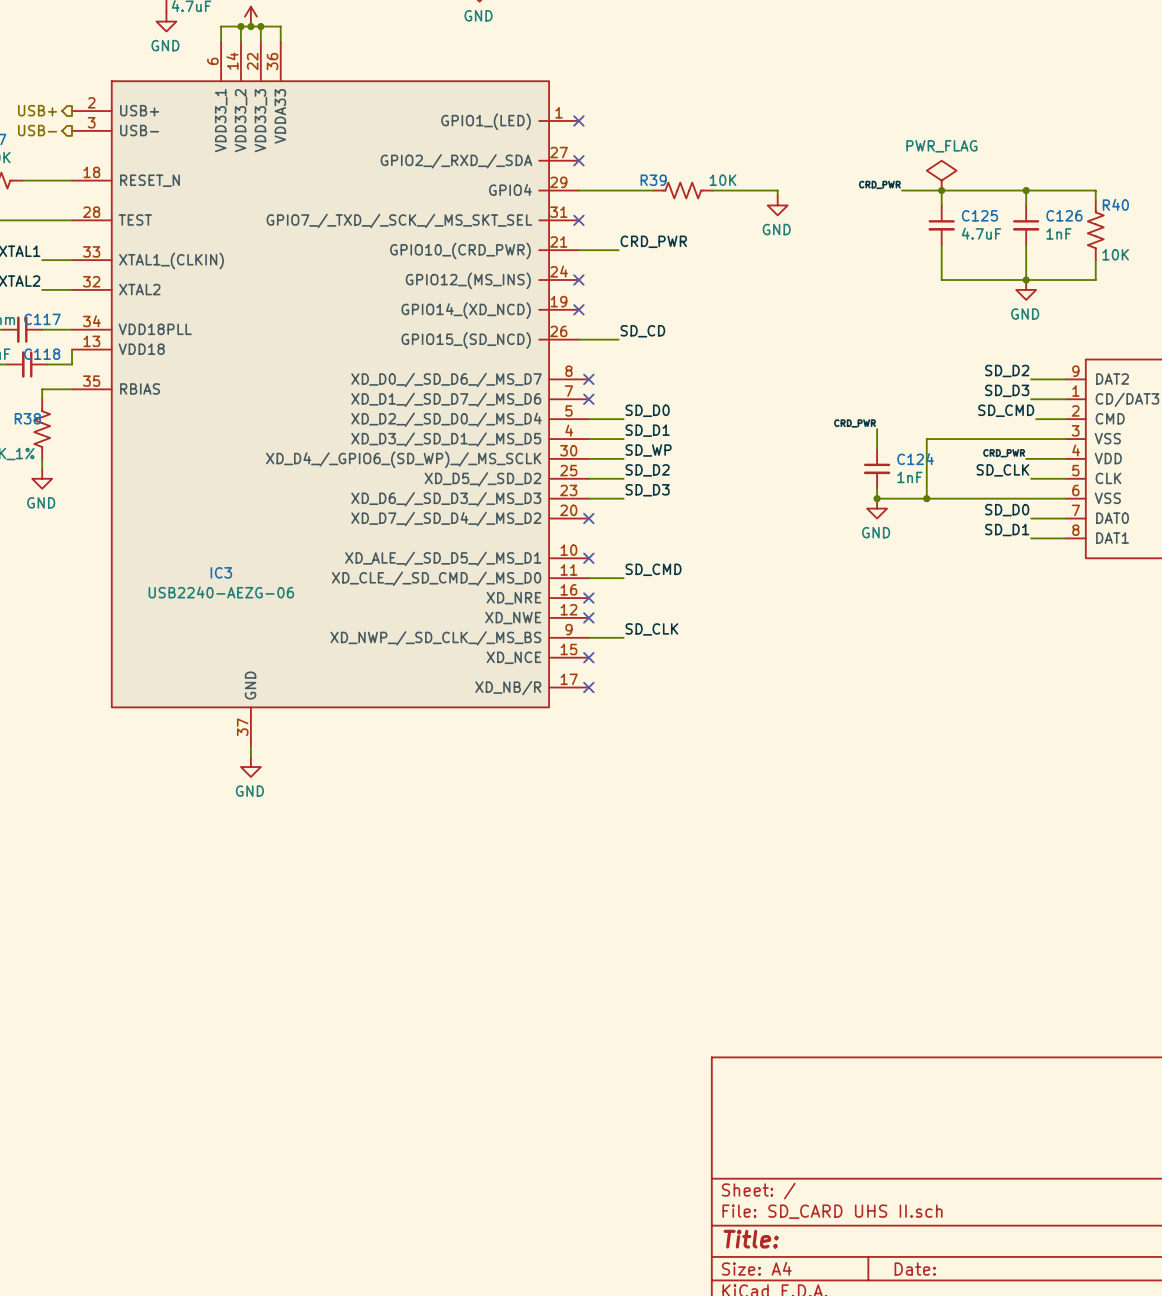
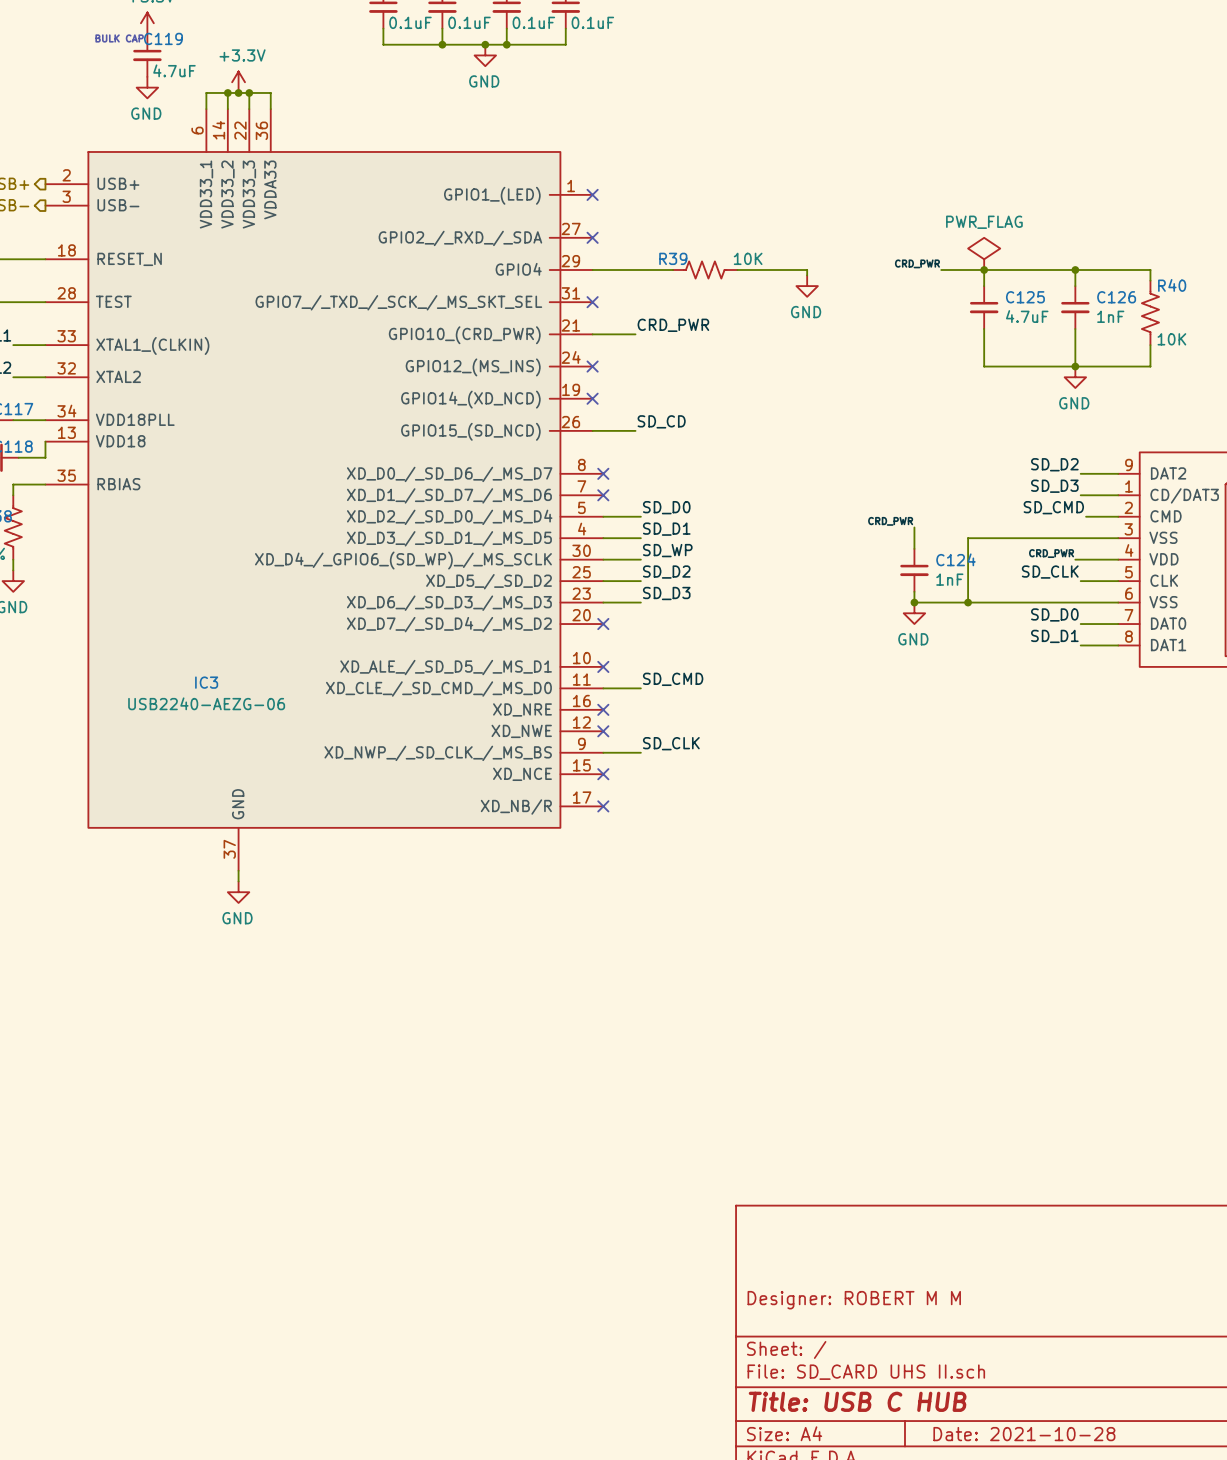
title block: none -> Designer: ROBERT M M (854, 1300)
title block: Title: (751, 1239) -> Title: USB C HUB (857, 1401)
title block: Date: (915, 1269) -> Date: 2021-10-28 (1024, 1434)

